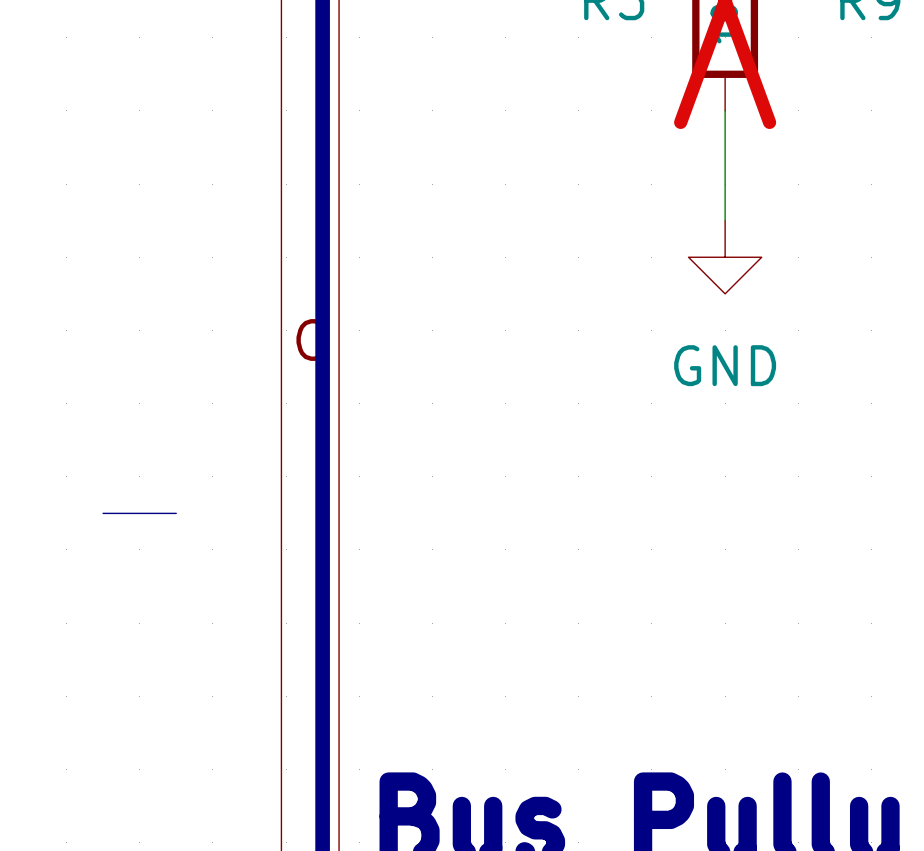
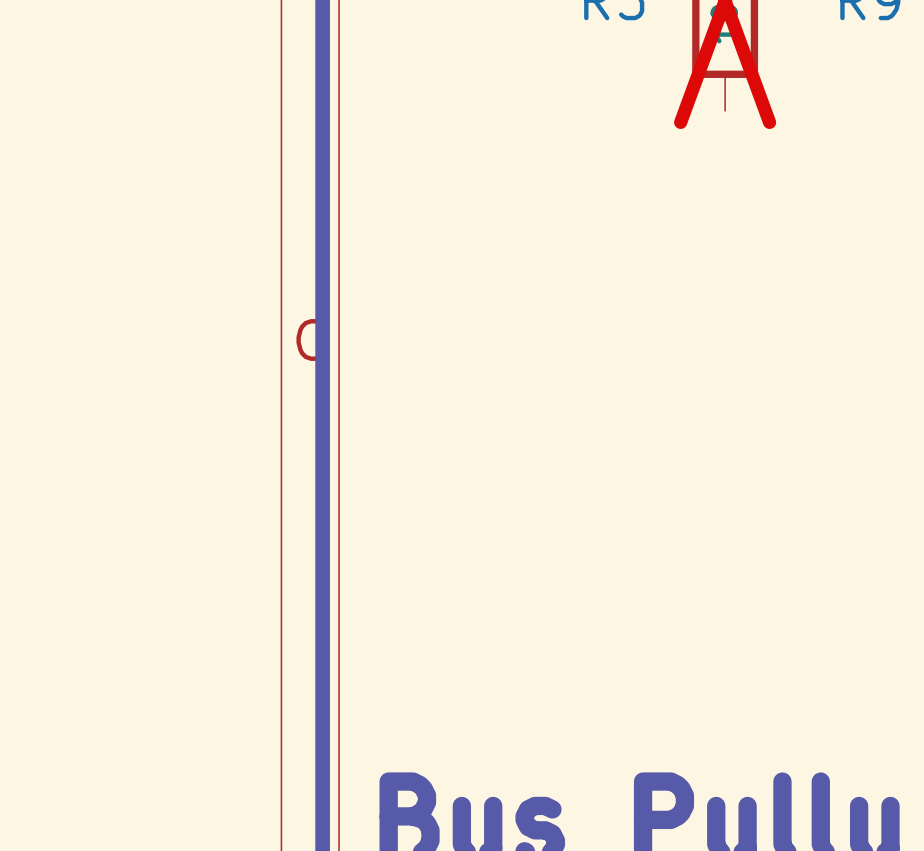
wire: (725, 110) (725, 220) -> none
power symbol: GND (725, 257) -> none
bus: (103, 513) (176, 513) -> none

